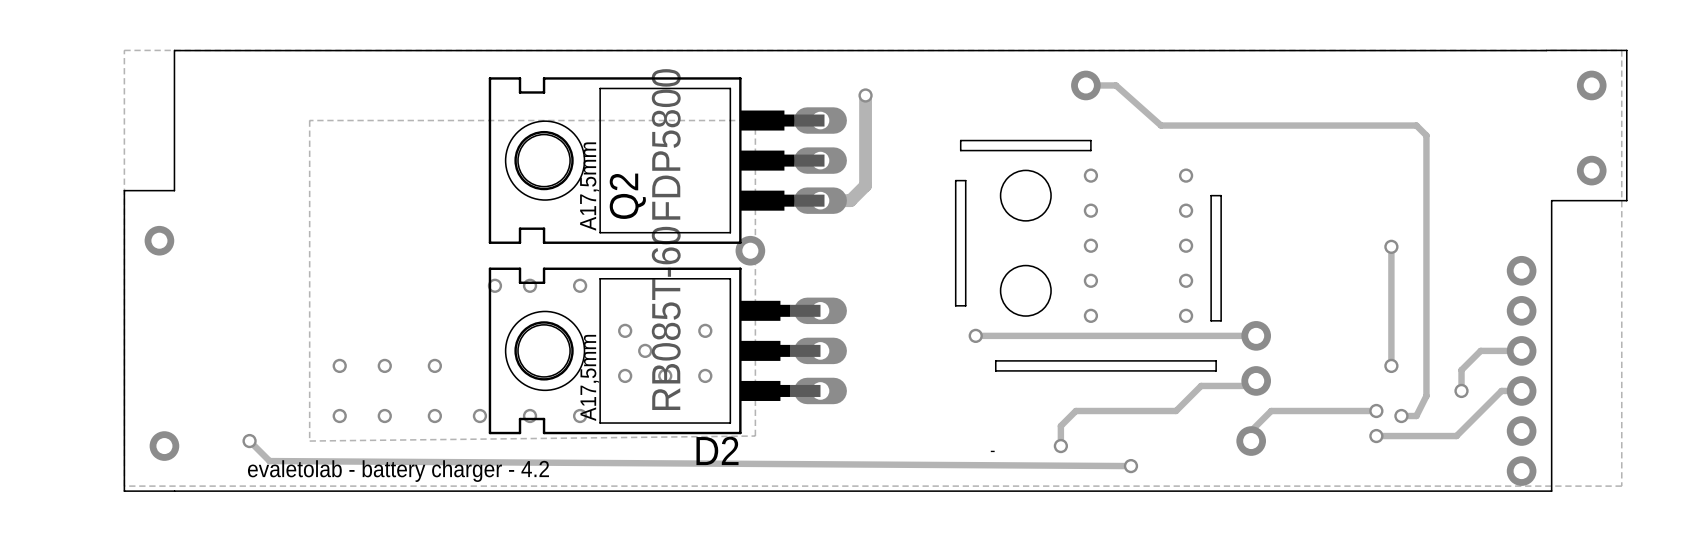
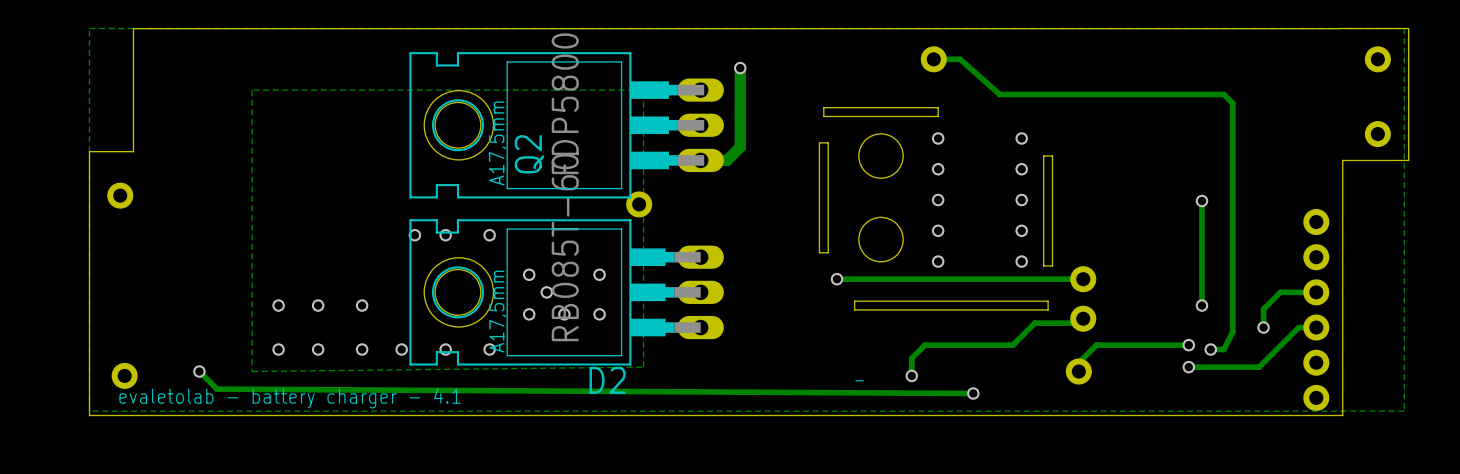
text: evaletolab - battery charger - 4.2 (398, 471) -> evaletolab - battery charger - 4.1 (290, 398)

